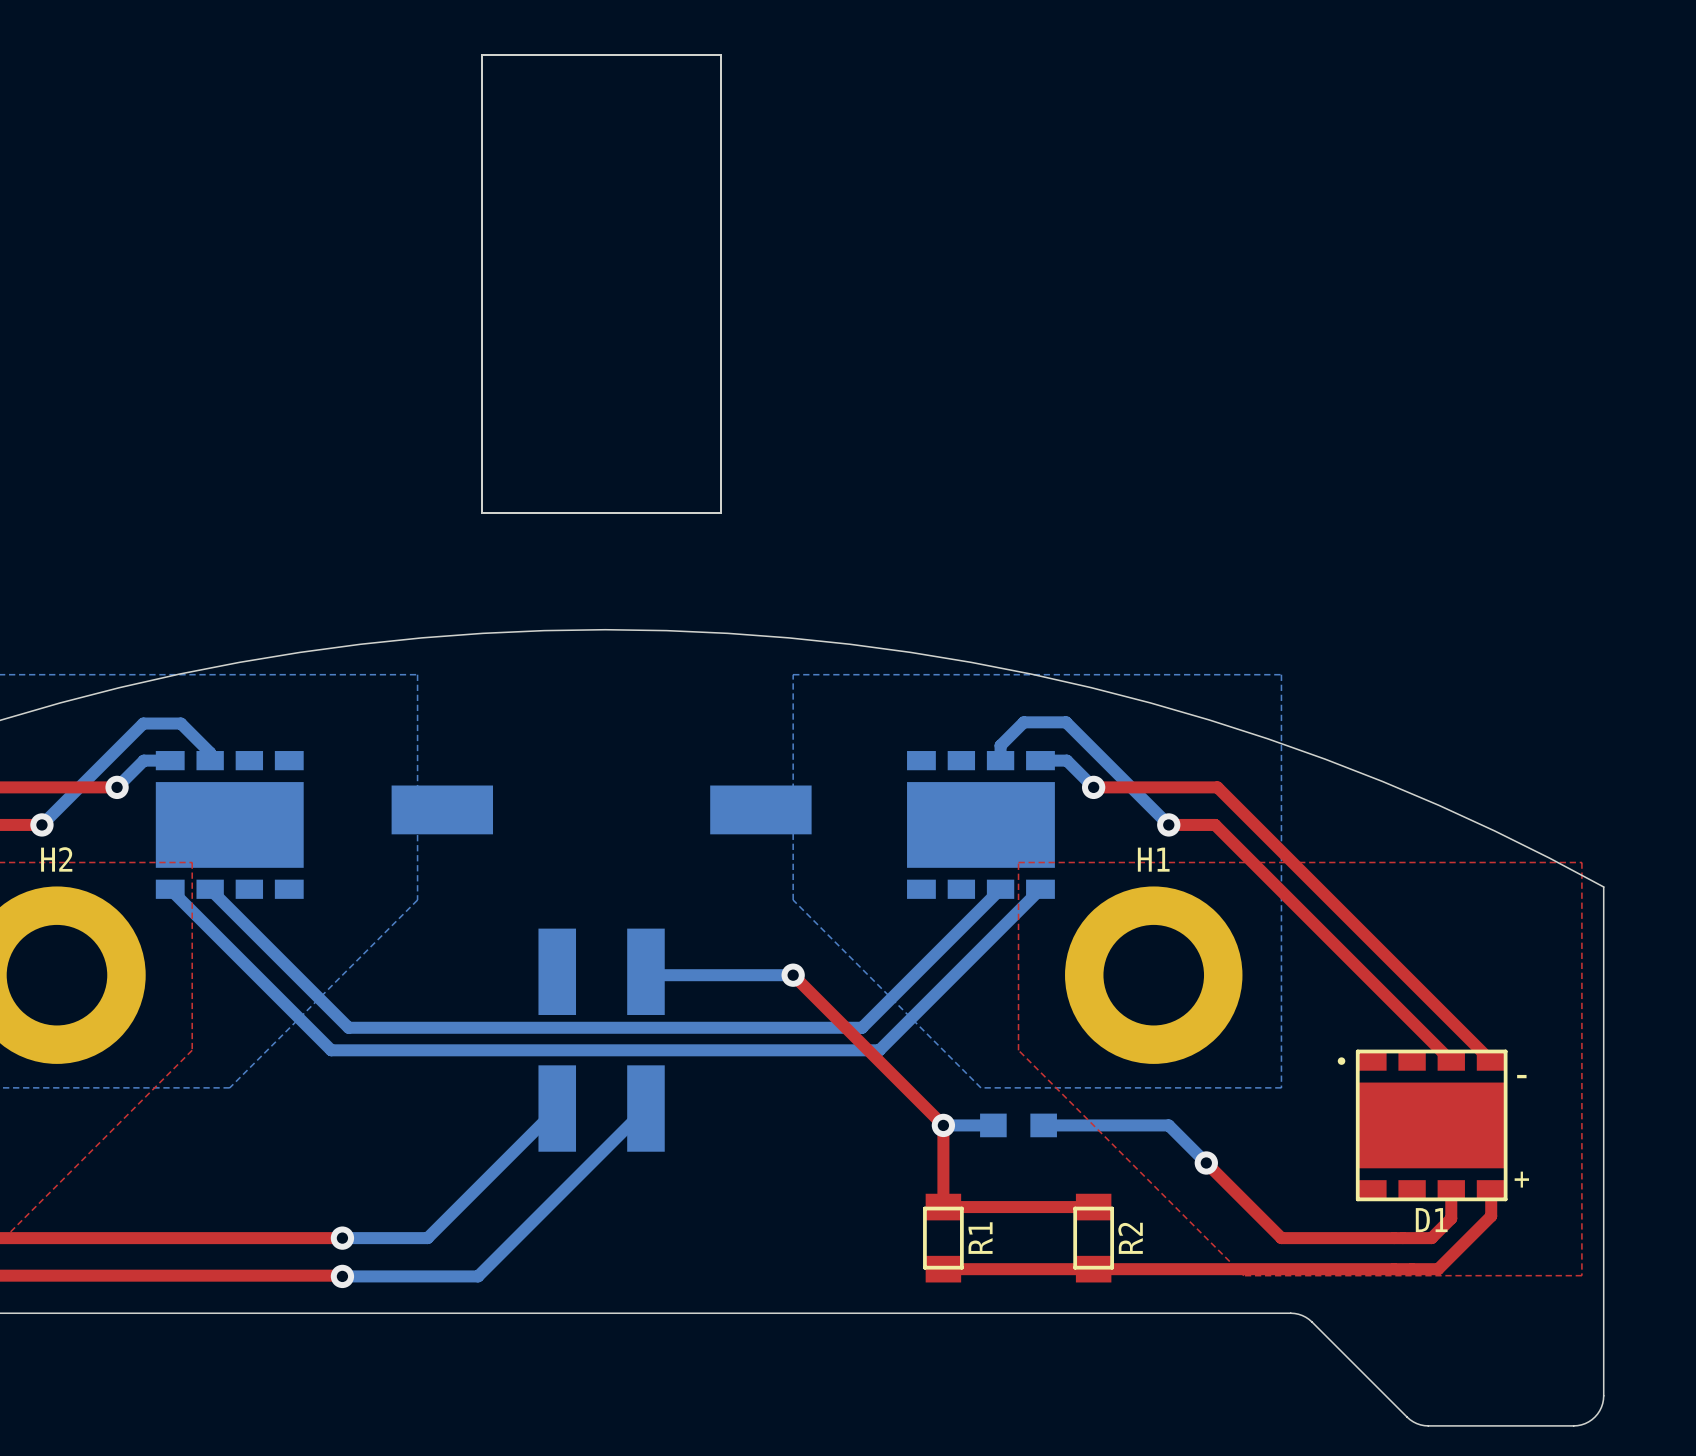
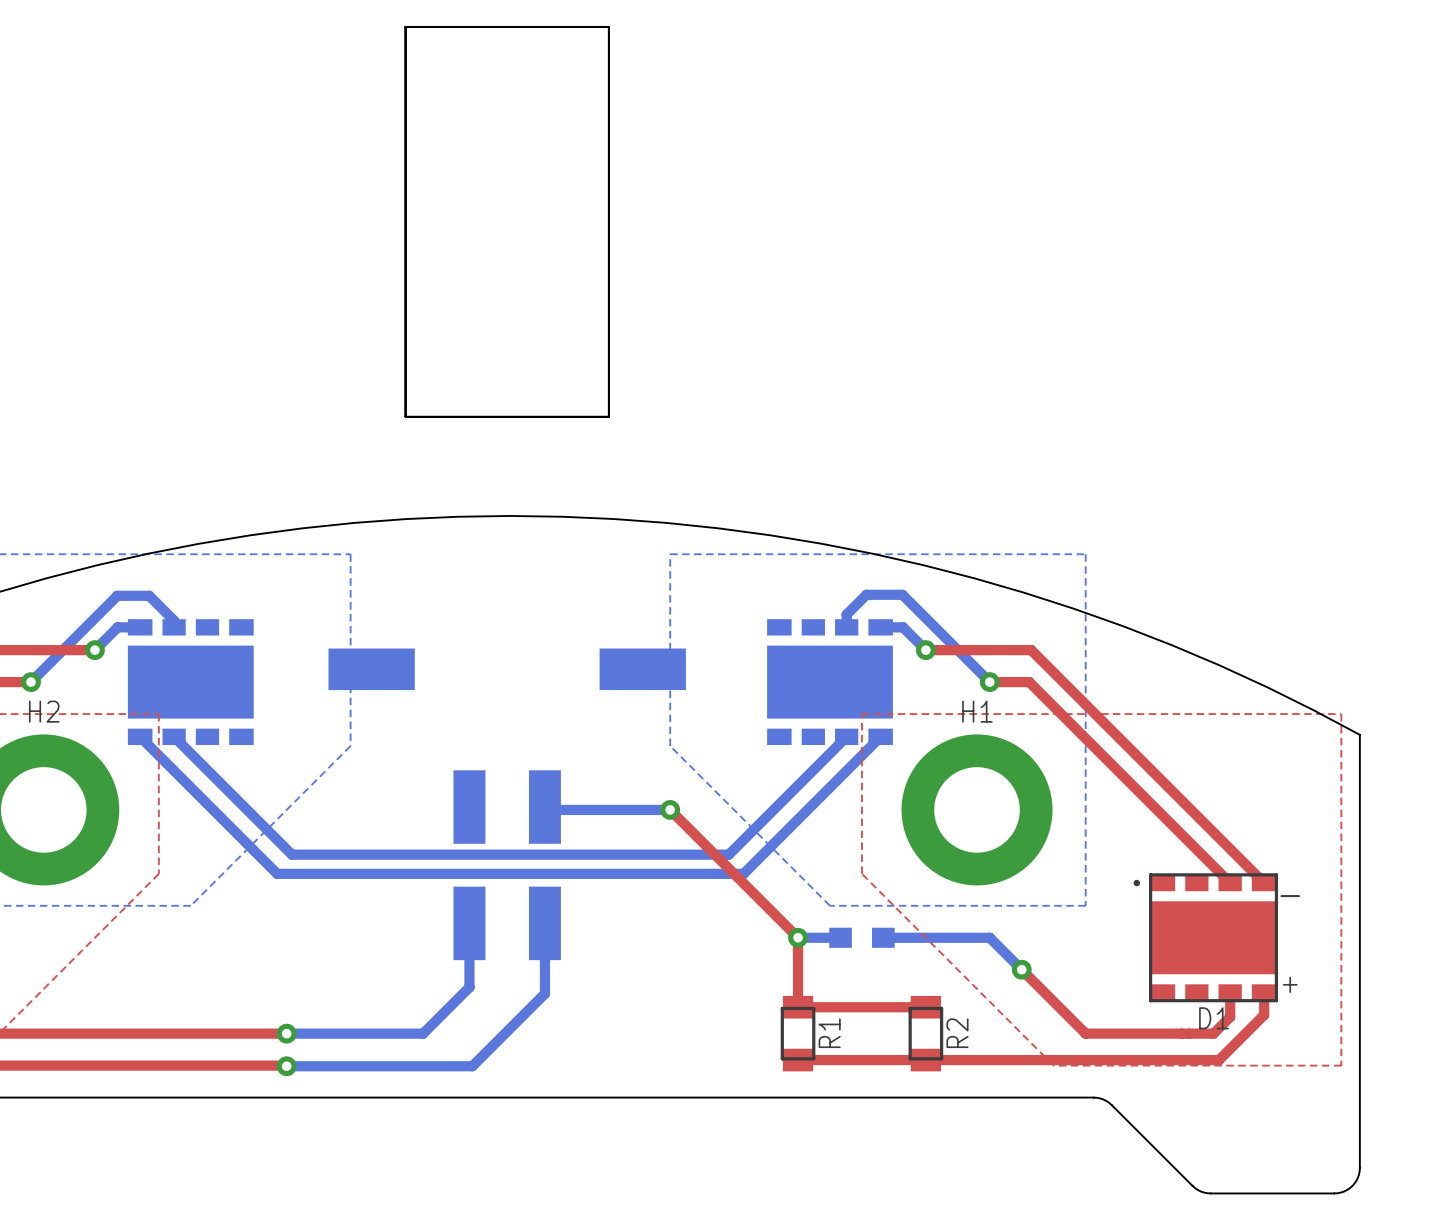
bottom track: (557, 1108) (427, 1238) -> (469, 923) (469, 987) (423, 1033) (359, 1033)
bottom track: (645, 1108) (478, 1276) -> (544, 923) (544, 993) (472, 1066) (402, 1066)

